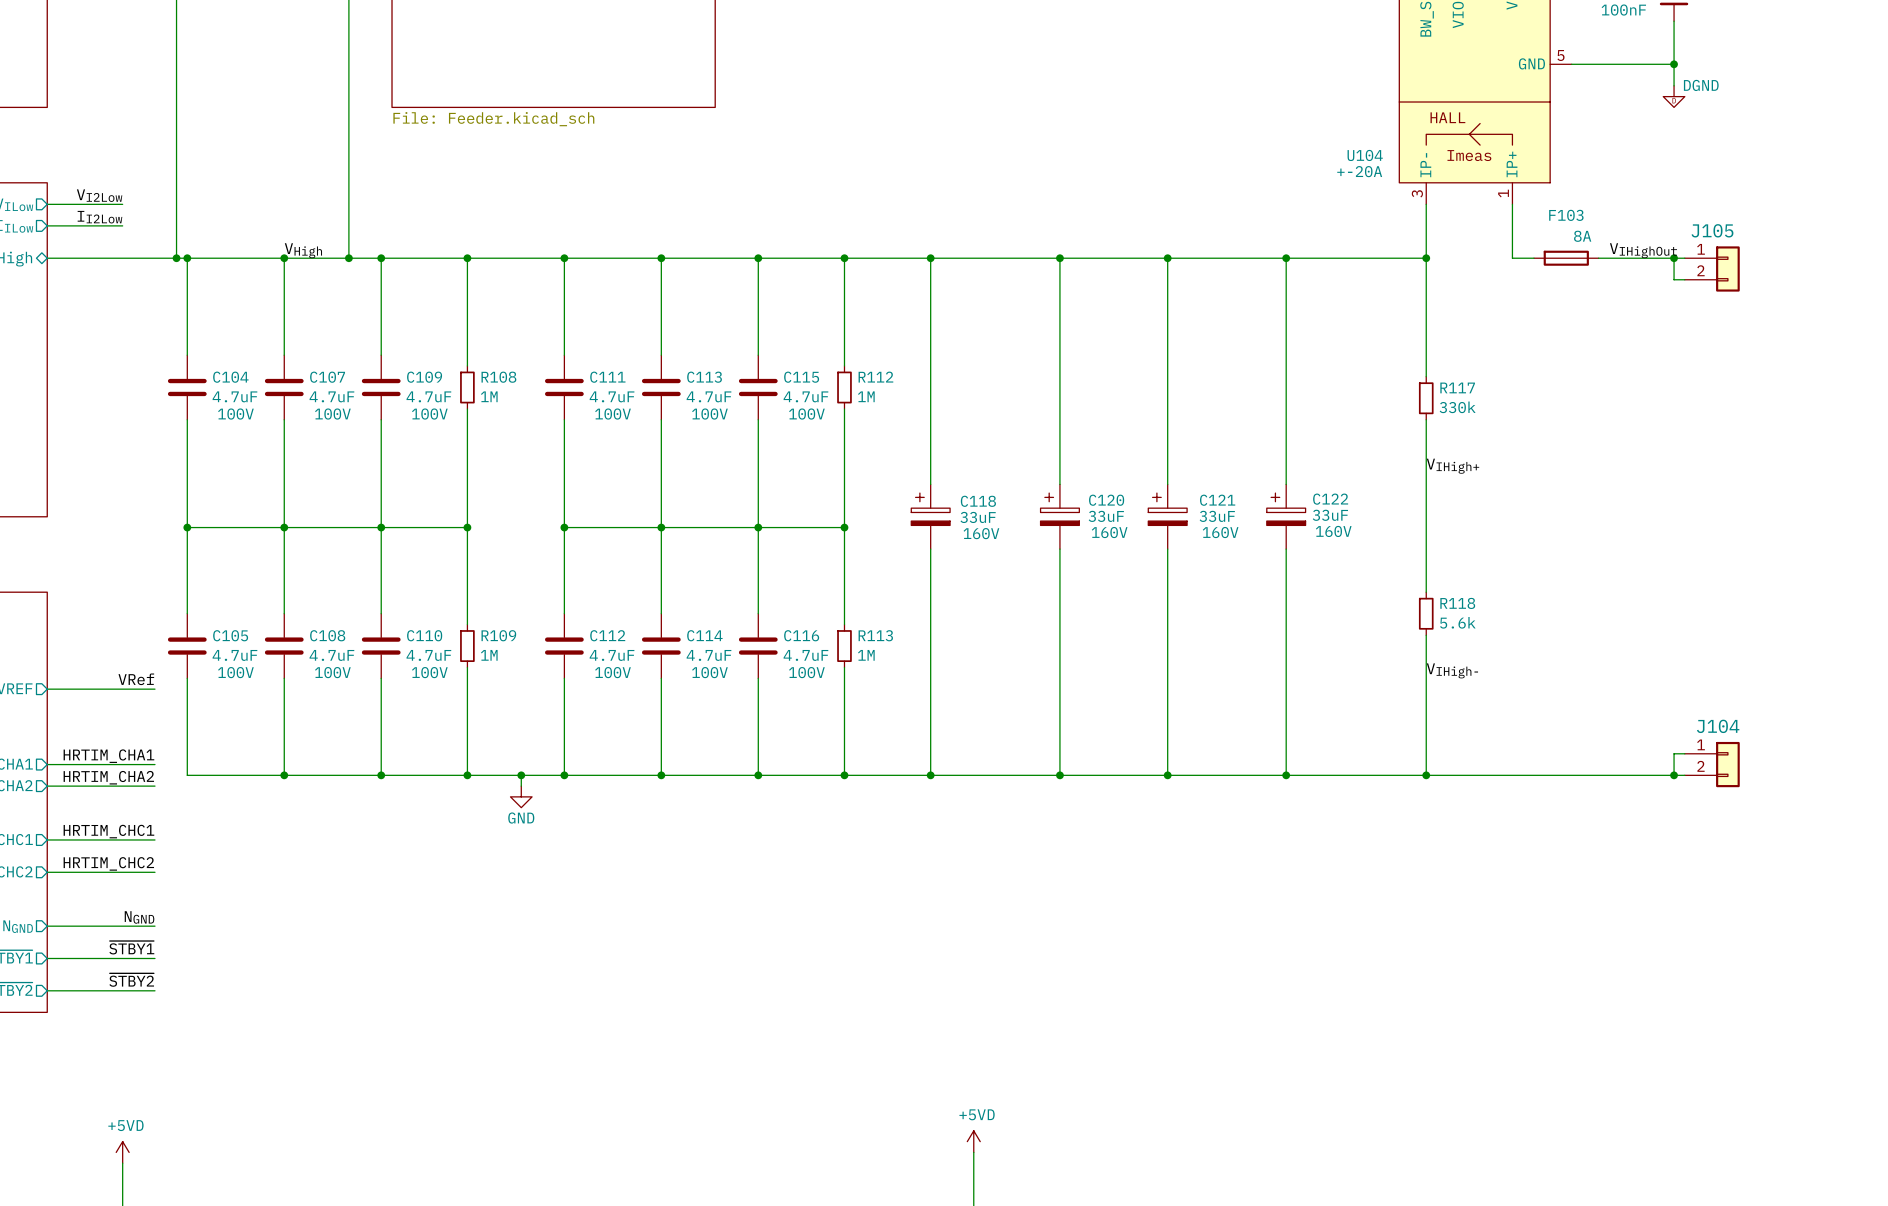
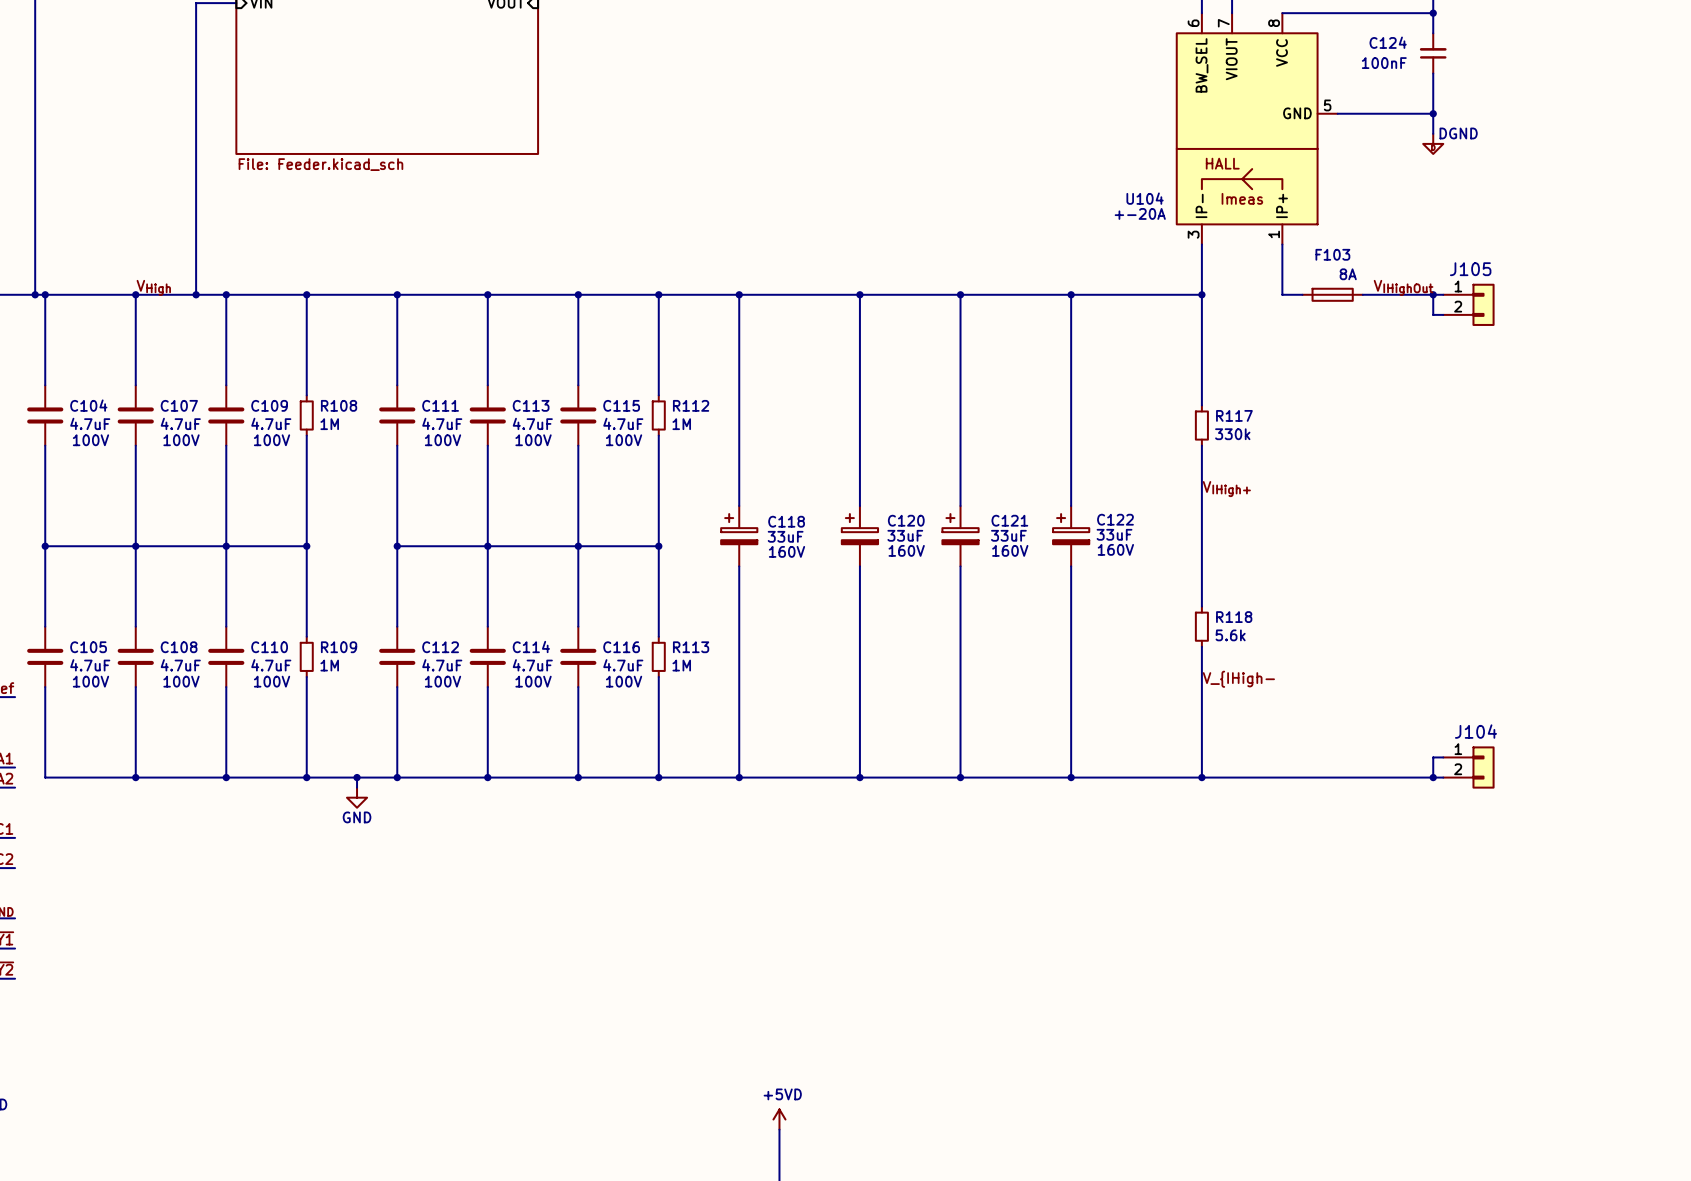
label: VIHigh- (1452, 670) -> V_{IHigh- (1238, 679)

